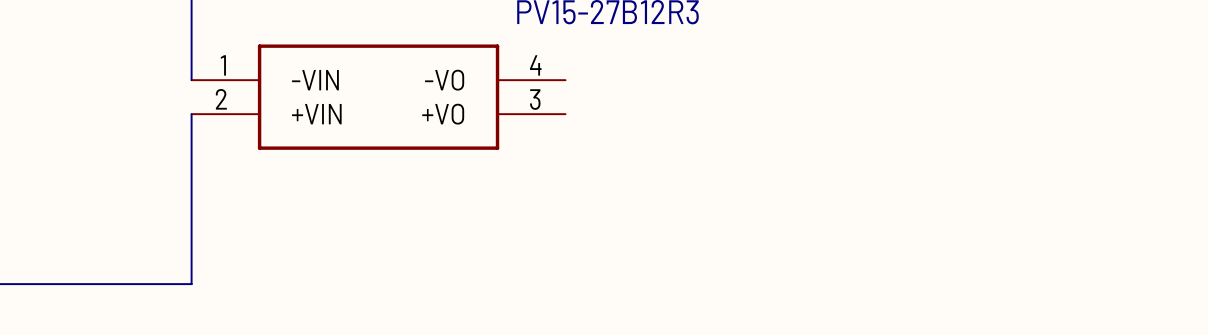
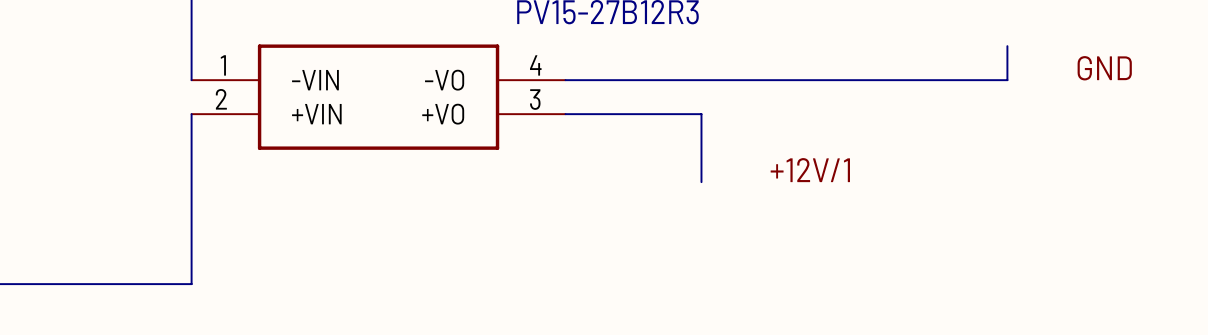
wire: none -> (1007, 46) (1007, 80) (565, 80)
label: none -> GND (1104, 68)
wire: none -> (565, 114) (701, 114) (701, 182)
label: none -> +12V/1 (810, 170)

